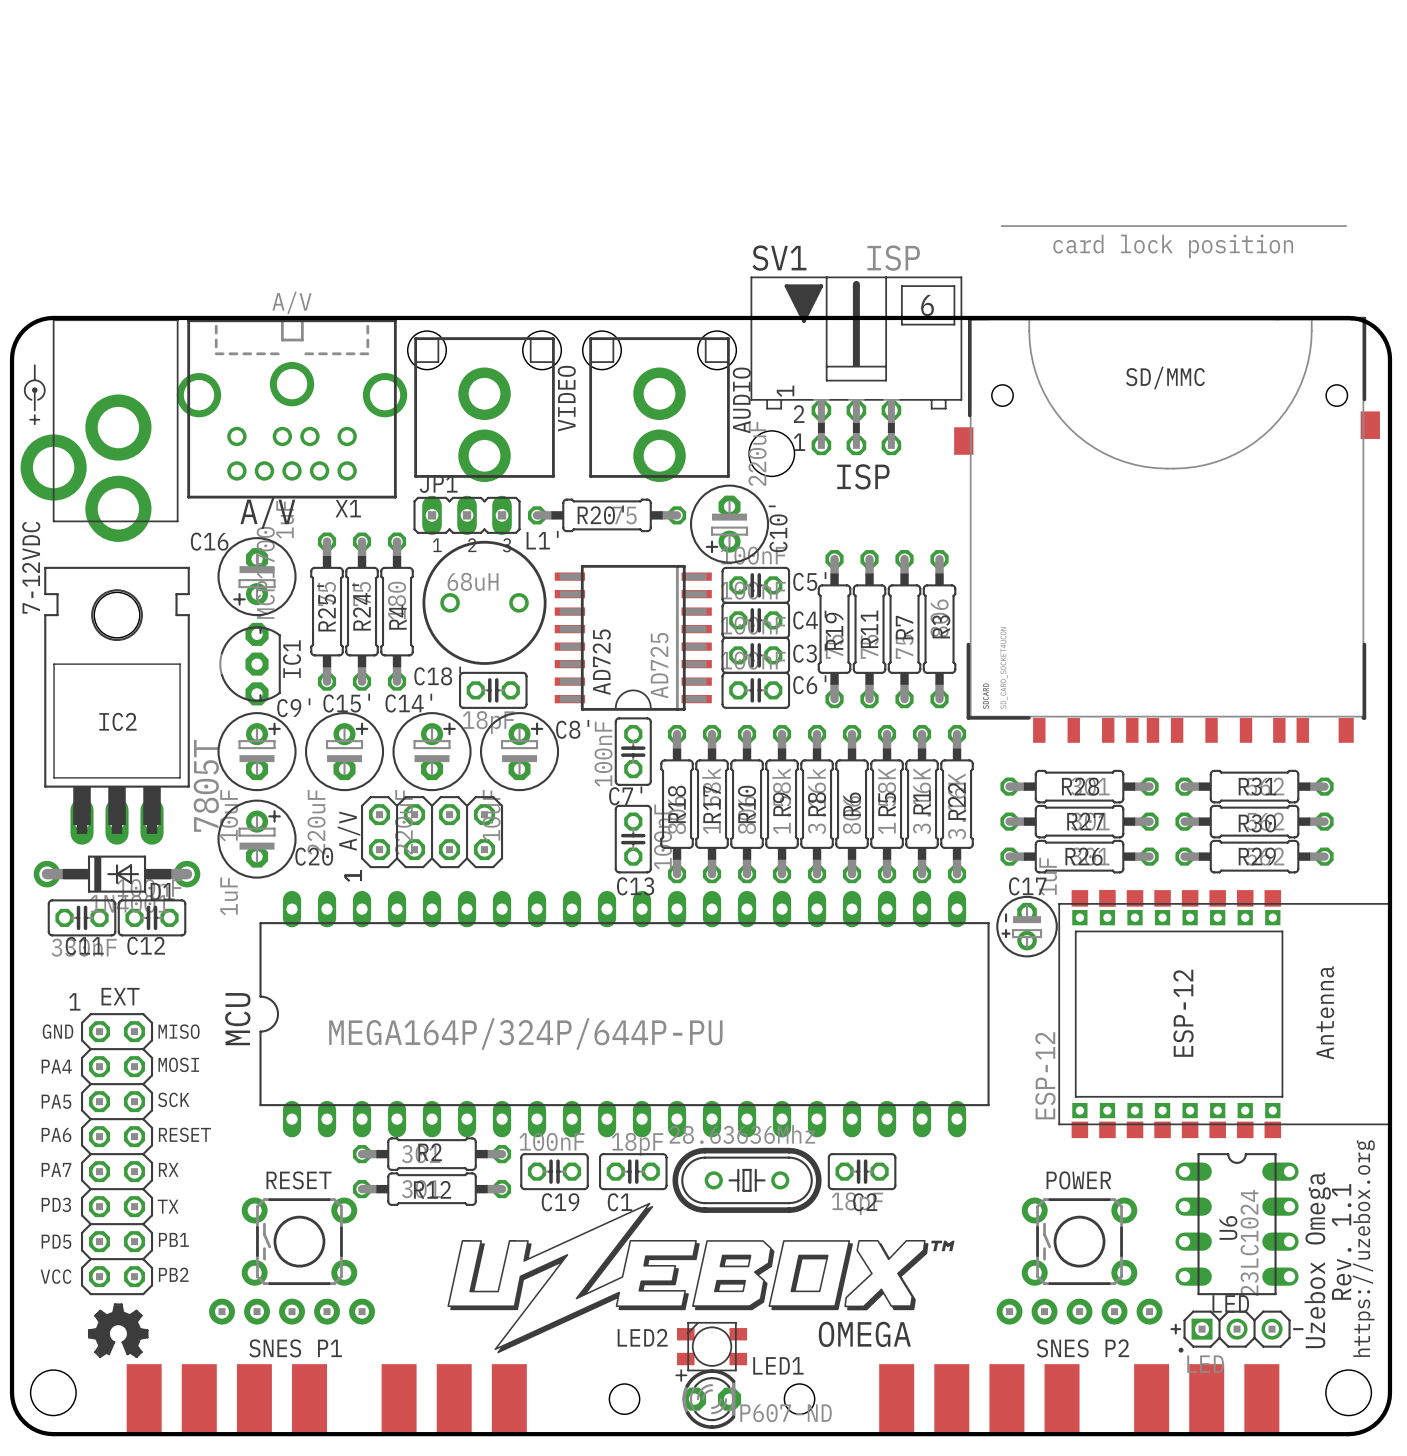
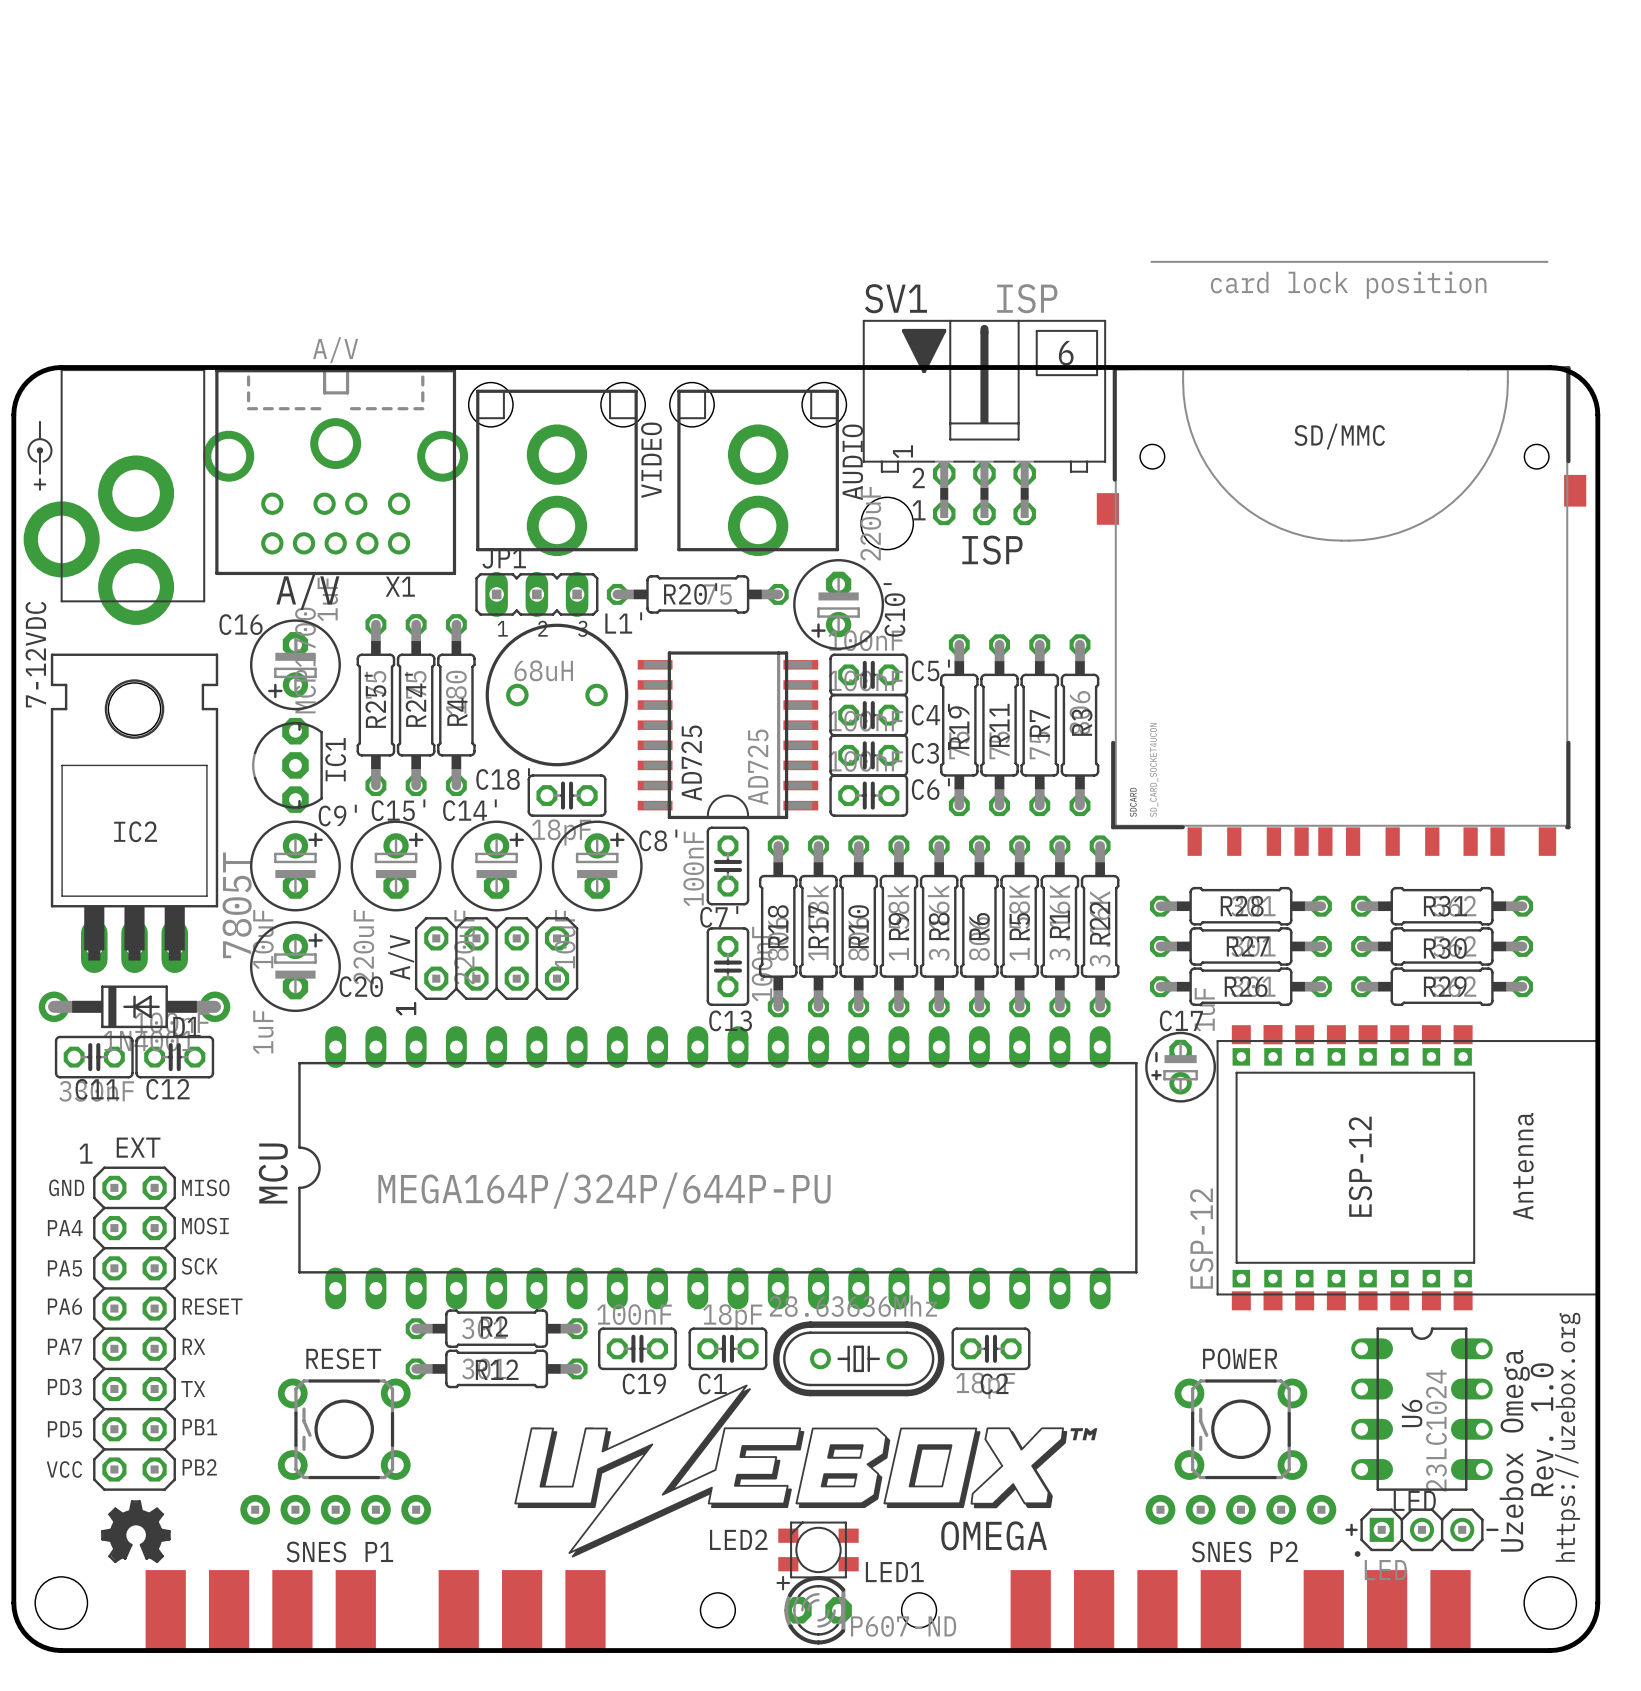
text: Rev. 1.1 (1341, 1241) -> Rev. 1.0 (1542, 1429)

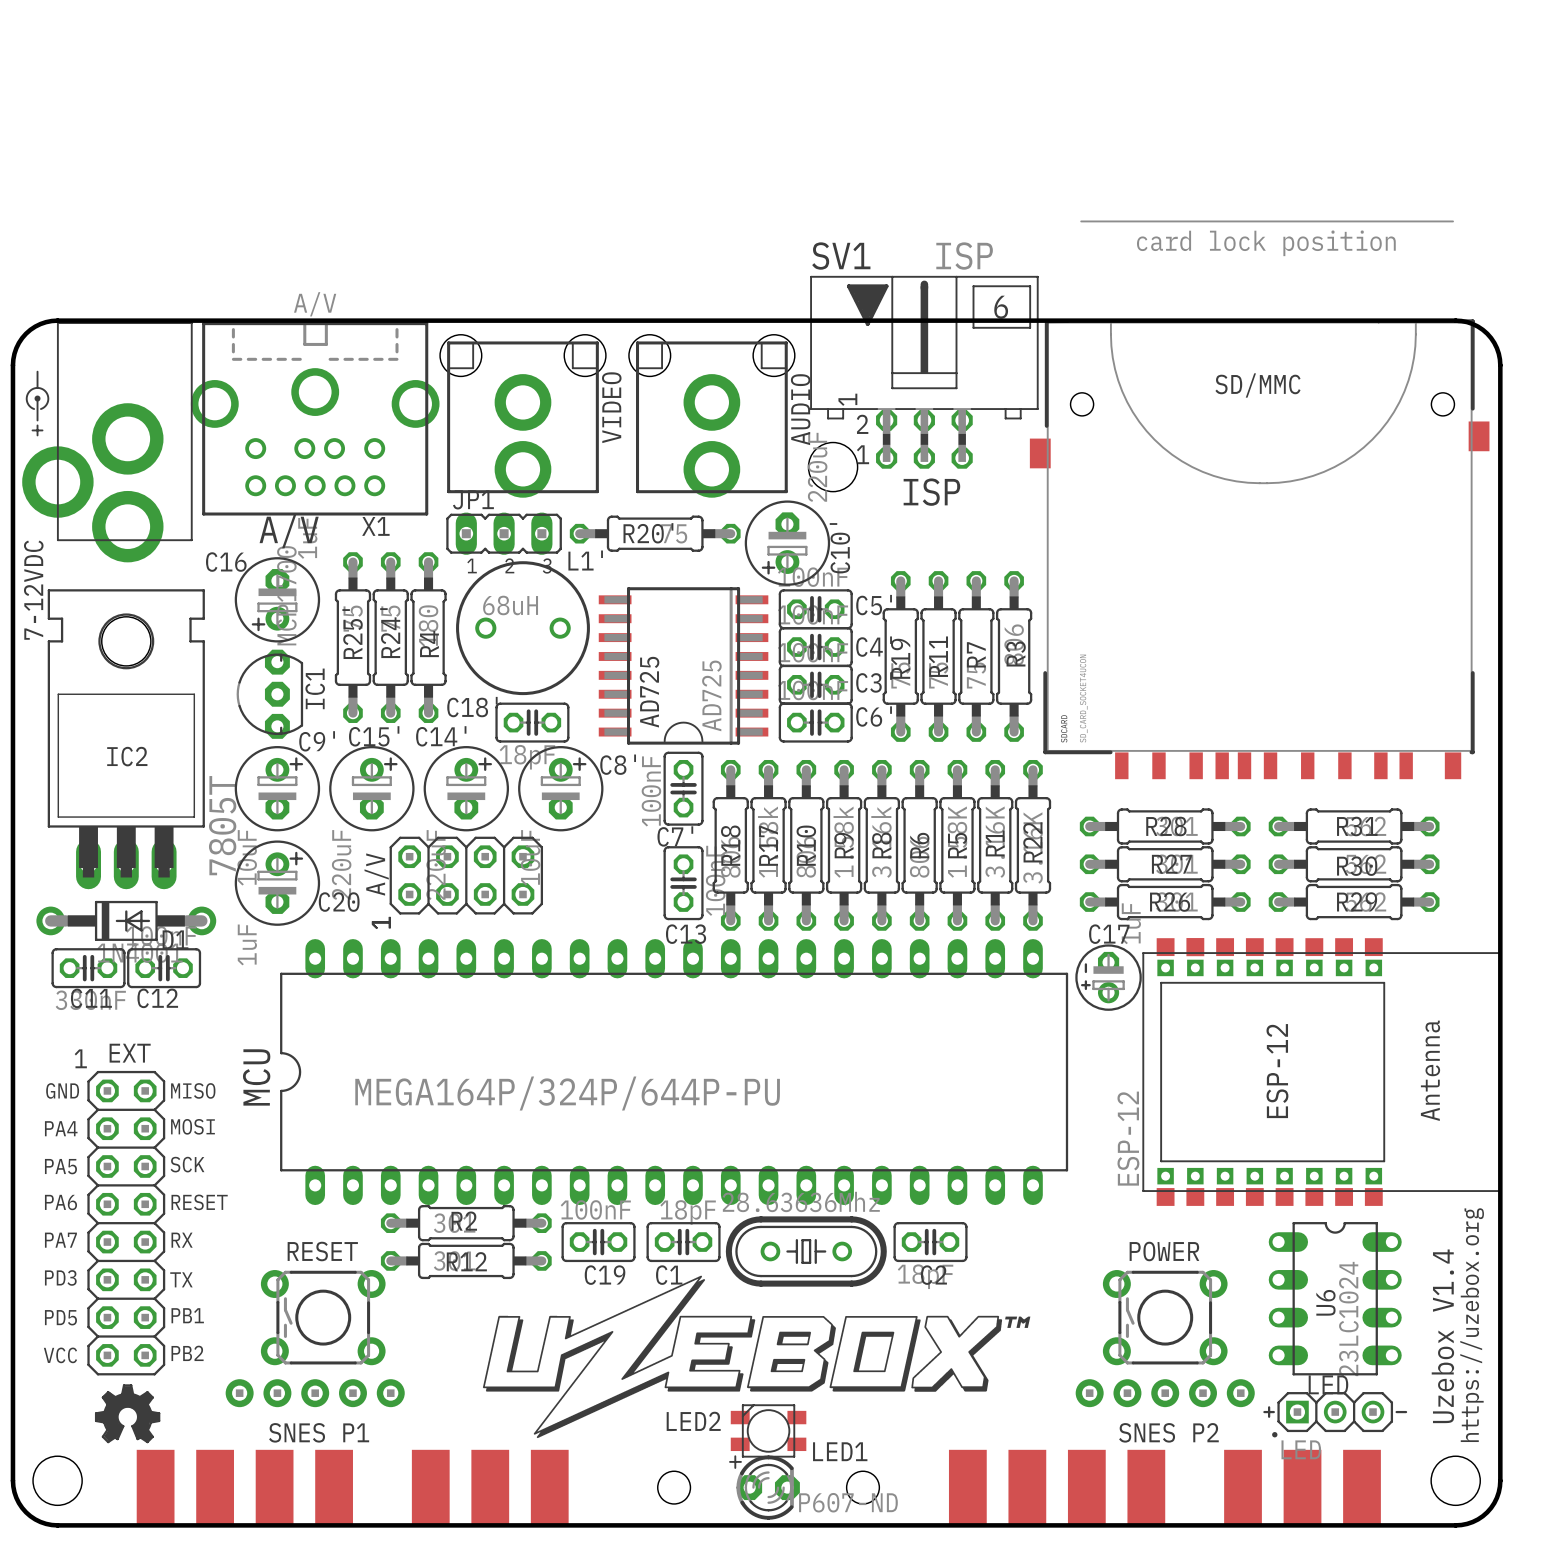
text: Rev. 1.0 (1542, 1429) -> none
text: Uzebox Omega (1514, 1450) -> Uzebox V1.4 (1442, 1336)
text: OMEGA (994, 1535) -> none

